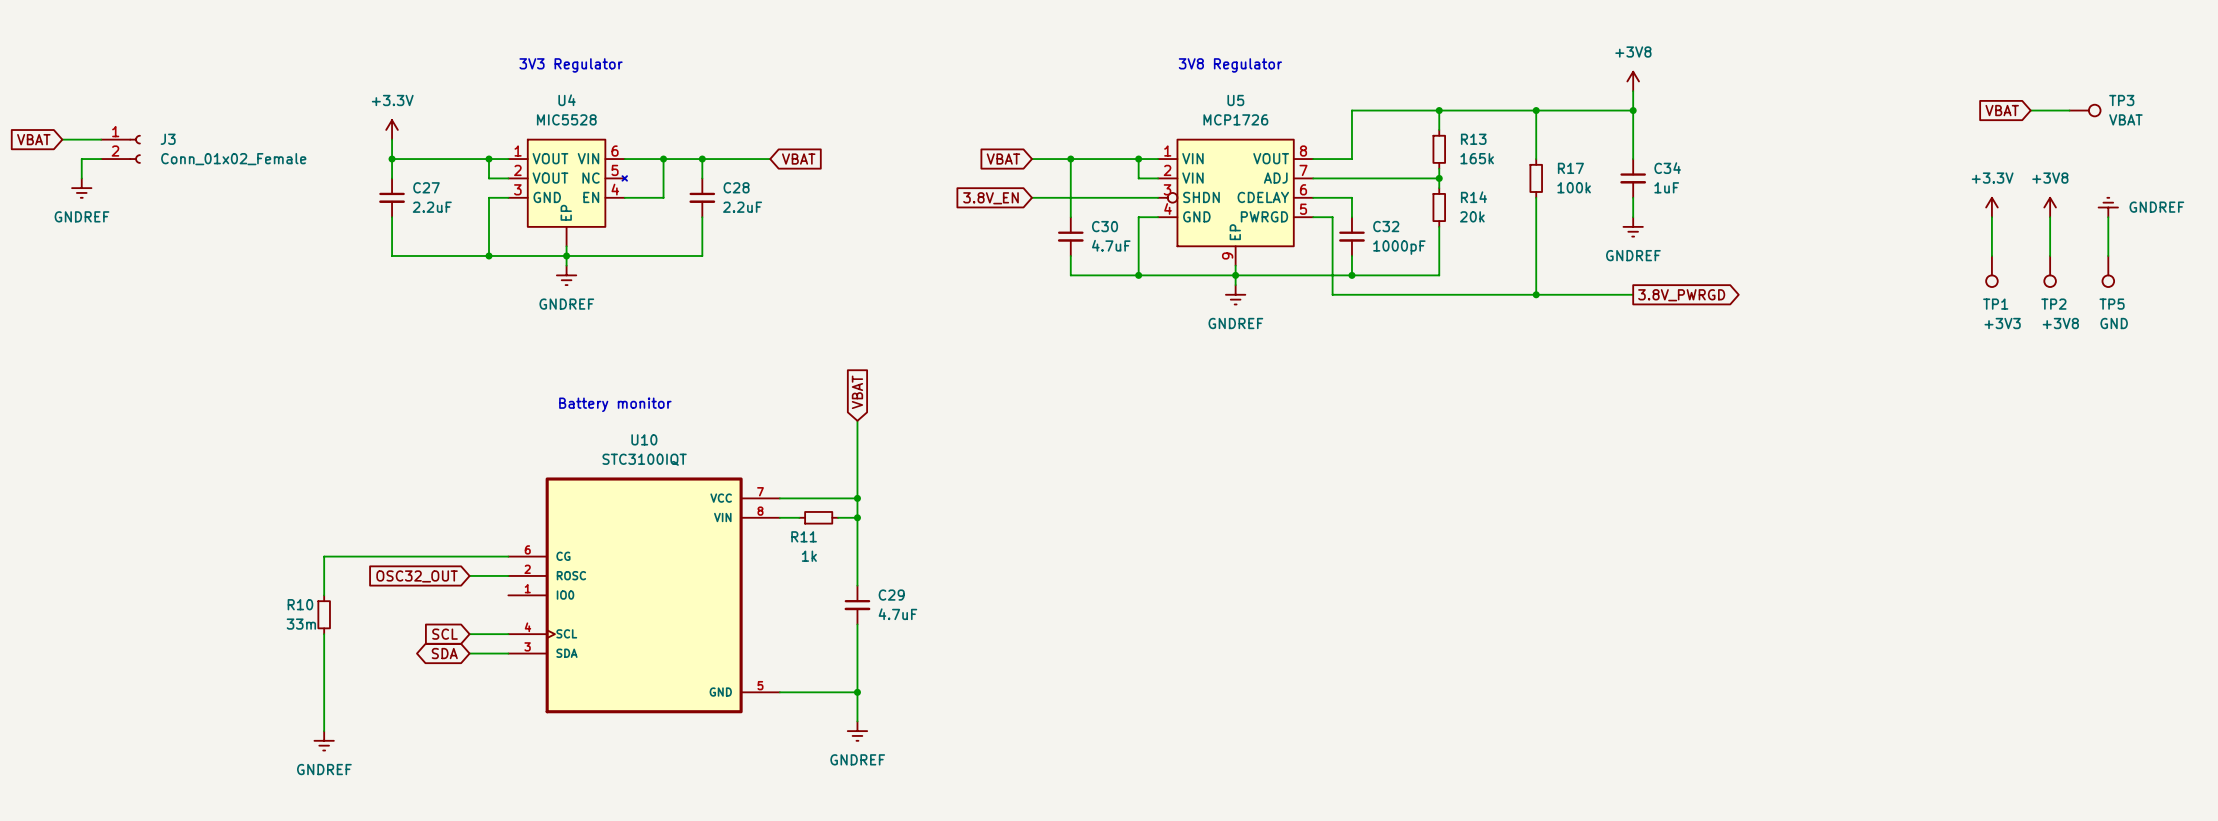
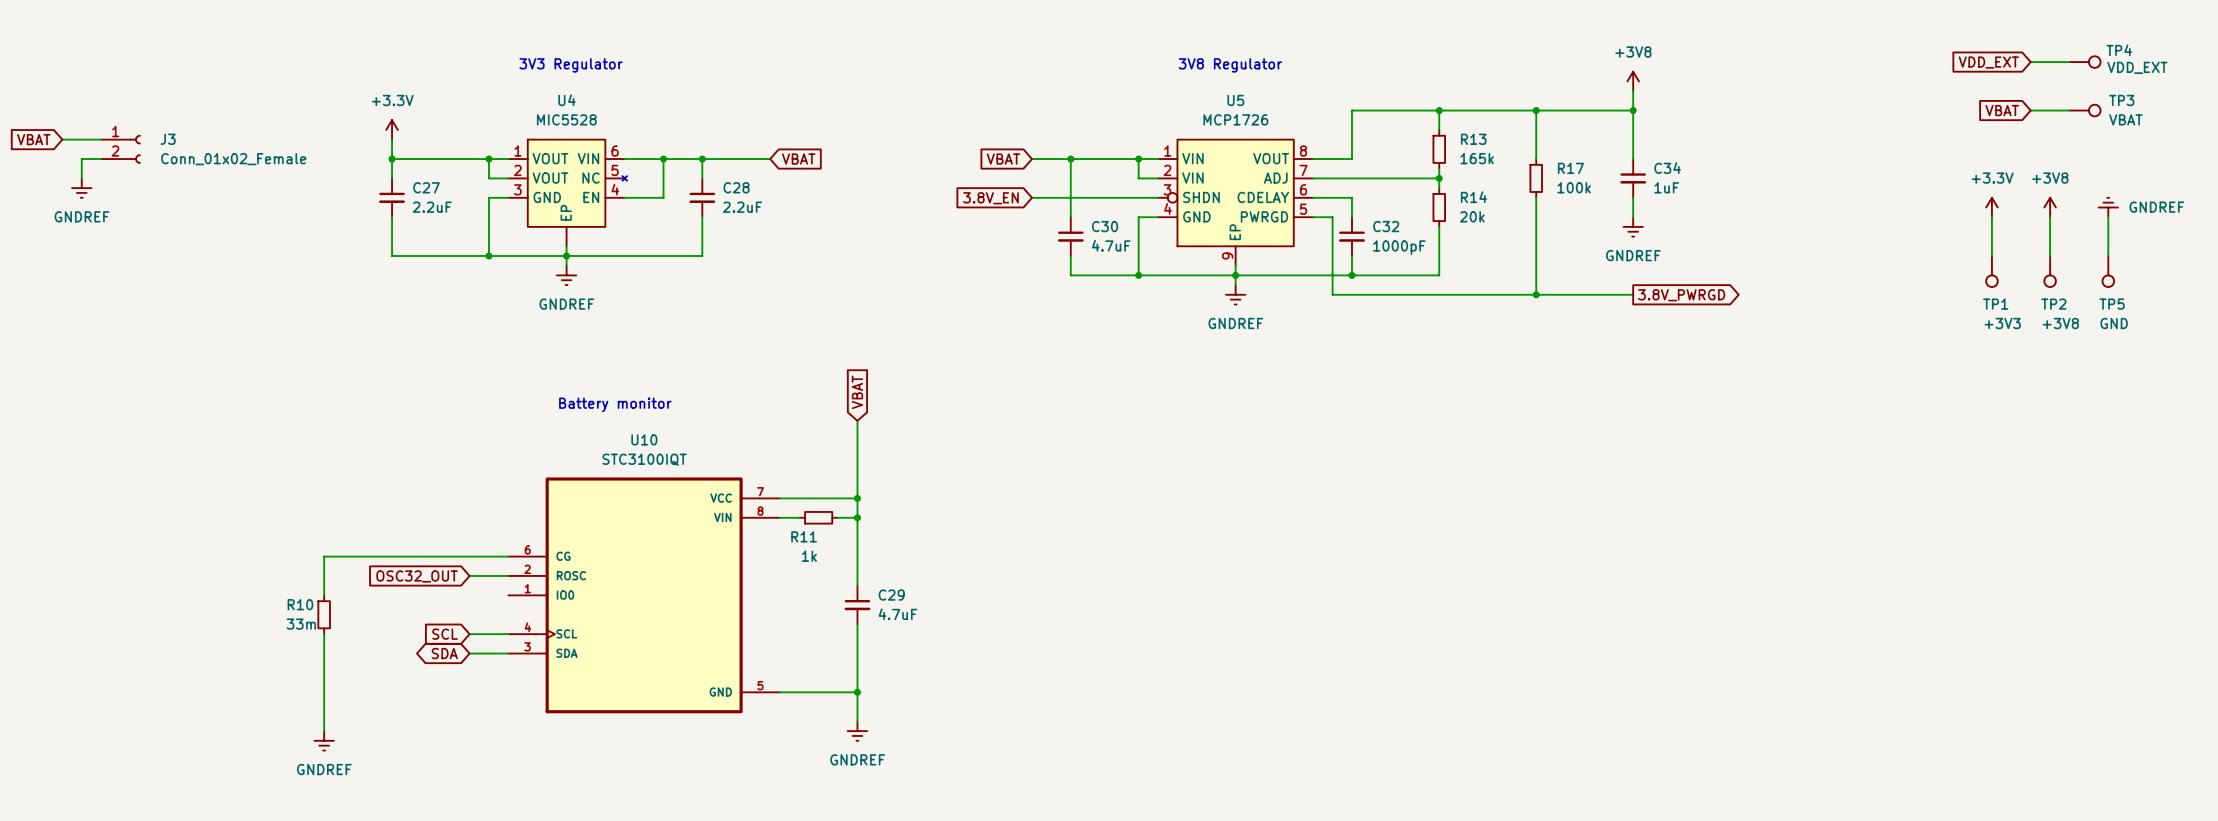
global label: none -> VDD_EXT (1988, 62)
wire: none -> (2030, 62) (2069, 62)
TP4: none -> VDD_EXT (2085, 62)

